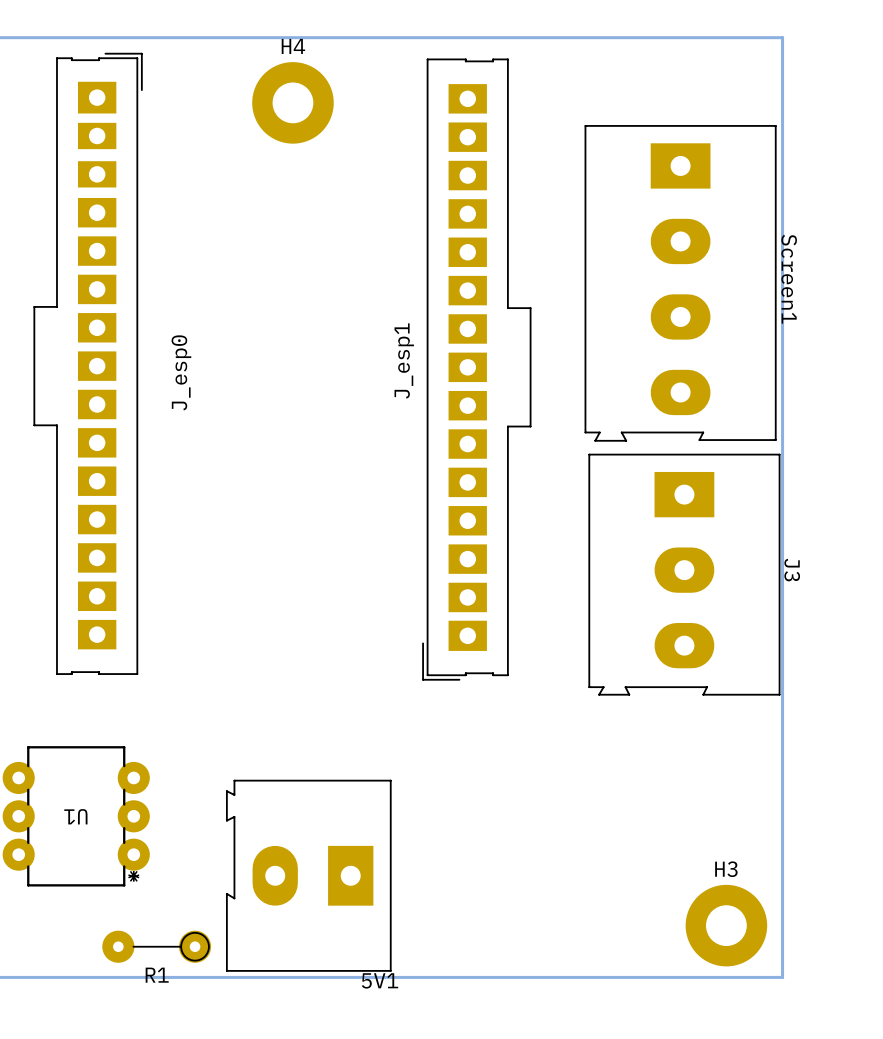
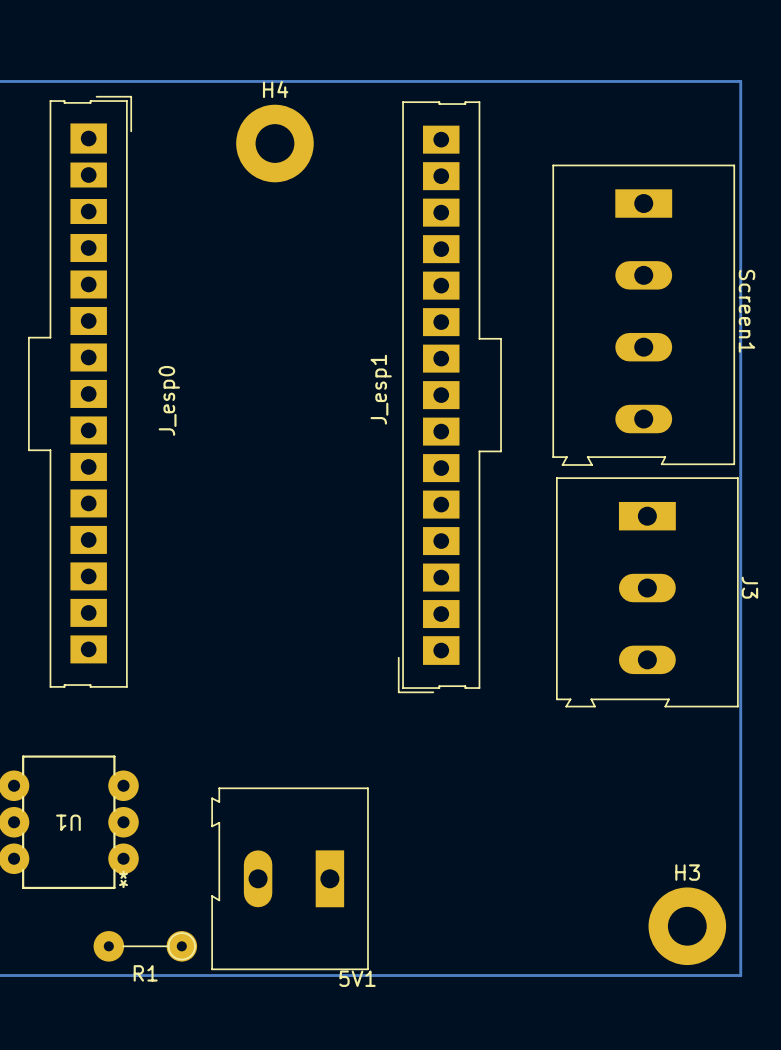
Screen1 footprint: [584, 125, 777, 442] -> [552, 164, 736, 466]
J3 footprint: [588, 453, 781, 696] -> [556, 477, 739, 708]
5V1 footprint: [225, 779, 392, 972] -> [211, 787, 369, 971]

